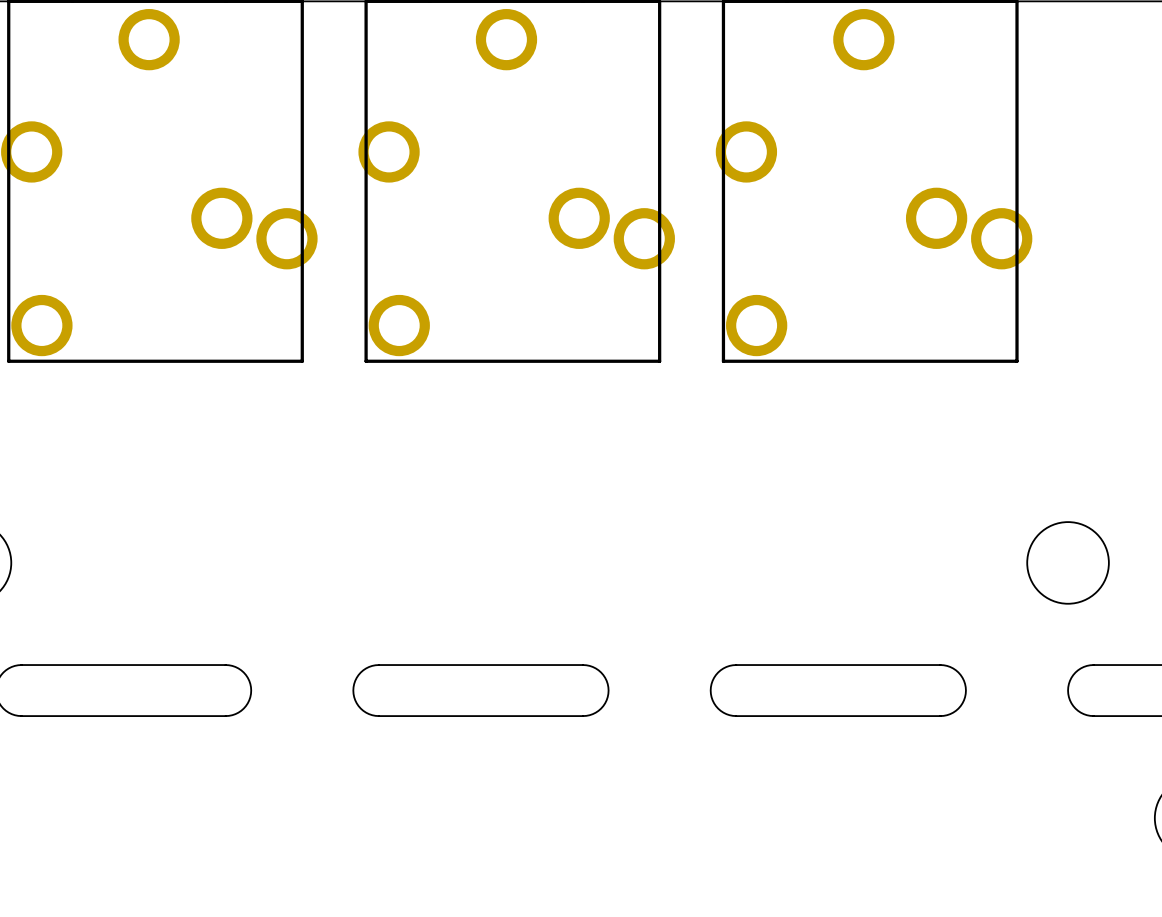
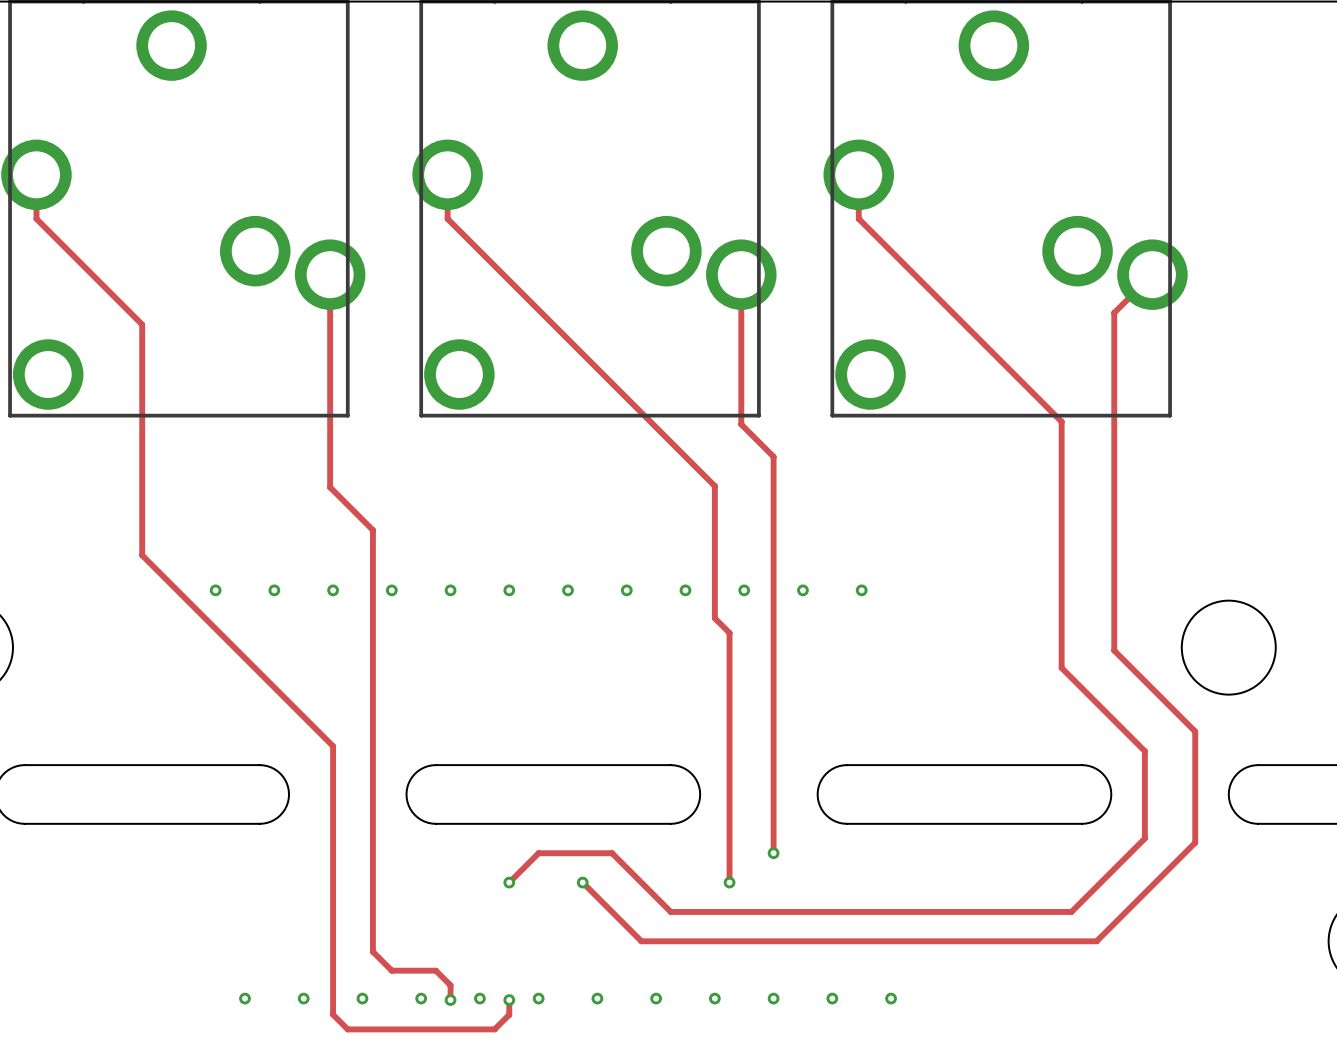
track: none -> (36, 174) (36, 218) (142, 324) (142, 555) (333, 746) (333, 1014) (347, 1029) (494, 1029) (509, 1014) (509, 1000)
track: none -> (447, 174) (447, 218) (714, 486) (714, 618) (729, 632) (729, 882)
track: none -> (858, 174) (858, 218) (1061, 421) (1061, 667) (1144, 751) (1144, 838) (1071, 911) (670, 911) (612, 853) (538, 853) (509, 882)
track: none -> (330, 274) (330, 487) (372, 530) (372, 951) (391, 970) (435, 970) (450, 985) (450, 1000)
track: none -> (741, 274) (741, 424) (773, 456) (773, 853)
track: none -> (1152, 274) (1114, 312) (1114, 650) (1195, 731) (1195, 842) (1096, 941) (641, 941) (582, 882)
via: none -> (215, 590)
via: none -> (274, 590)
via: none -> (333, 590)
via: none -> (391, 590)
via: none -> (450, 590)
via: none -> (509, 590)
via: none -> (568, 590)
via: none -> (626, 590)
via: none -> (685, 590)
via: none -> (744, 590)
via: none -> (802, 590)
via: none -> (861, 590)
via: none -> (773, 853)
via: none -> (509, 882)
via: none -> (582, 882)
via: none -> (729, 882)
via: none -> (244, 998)
via: none -> (303, 998)
via: none -> (362, 998)
via: none -> (421, 998)
via: none -> (479, 998)
via: none -> (538, 998)
via: none -> (597, 998)
via: none -> (656, 998)
via: none -> (714, 998)
via: none -> (773, 998)
via: none -> (832, 998)
via: none -> (891, 998)
via: none -> (450, 1000)
via: none -> (509, 1000)

